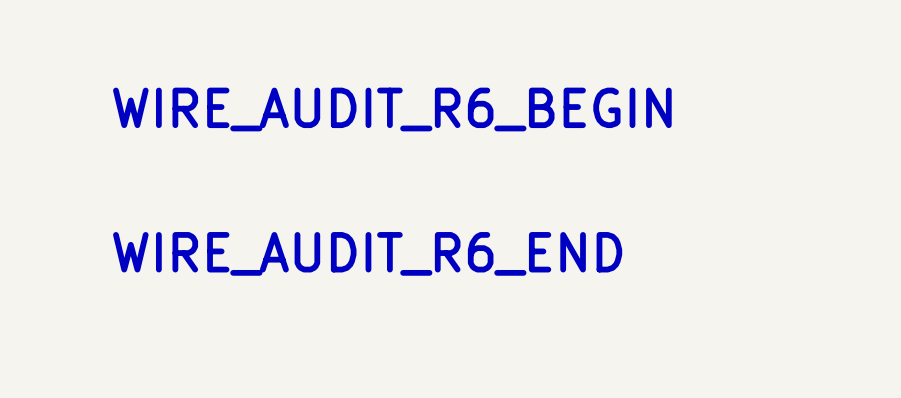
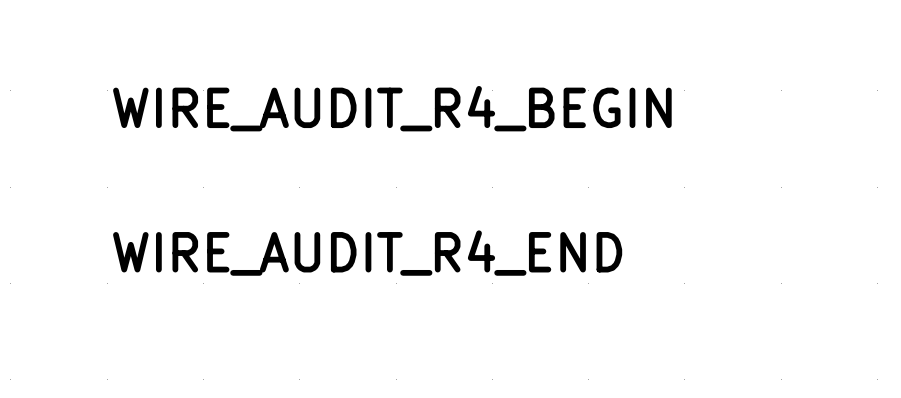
text: WIRE_AUDIT_R6_BEGIN (392, 109) -> WIRE_AUDIT_R4_BEGIN (392, 108)
text: WIRE_AUDIT_R6_END (367, 253) -> WIRE_AUDIT_R4_END (367, 253)

